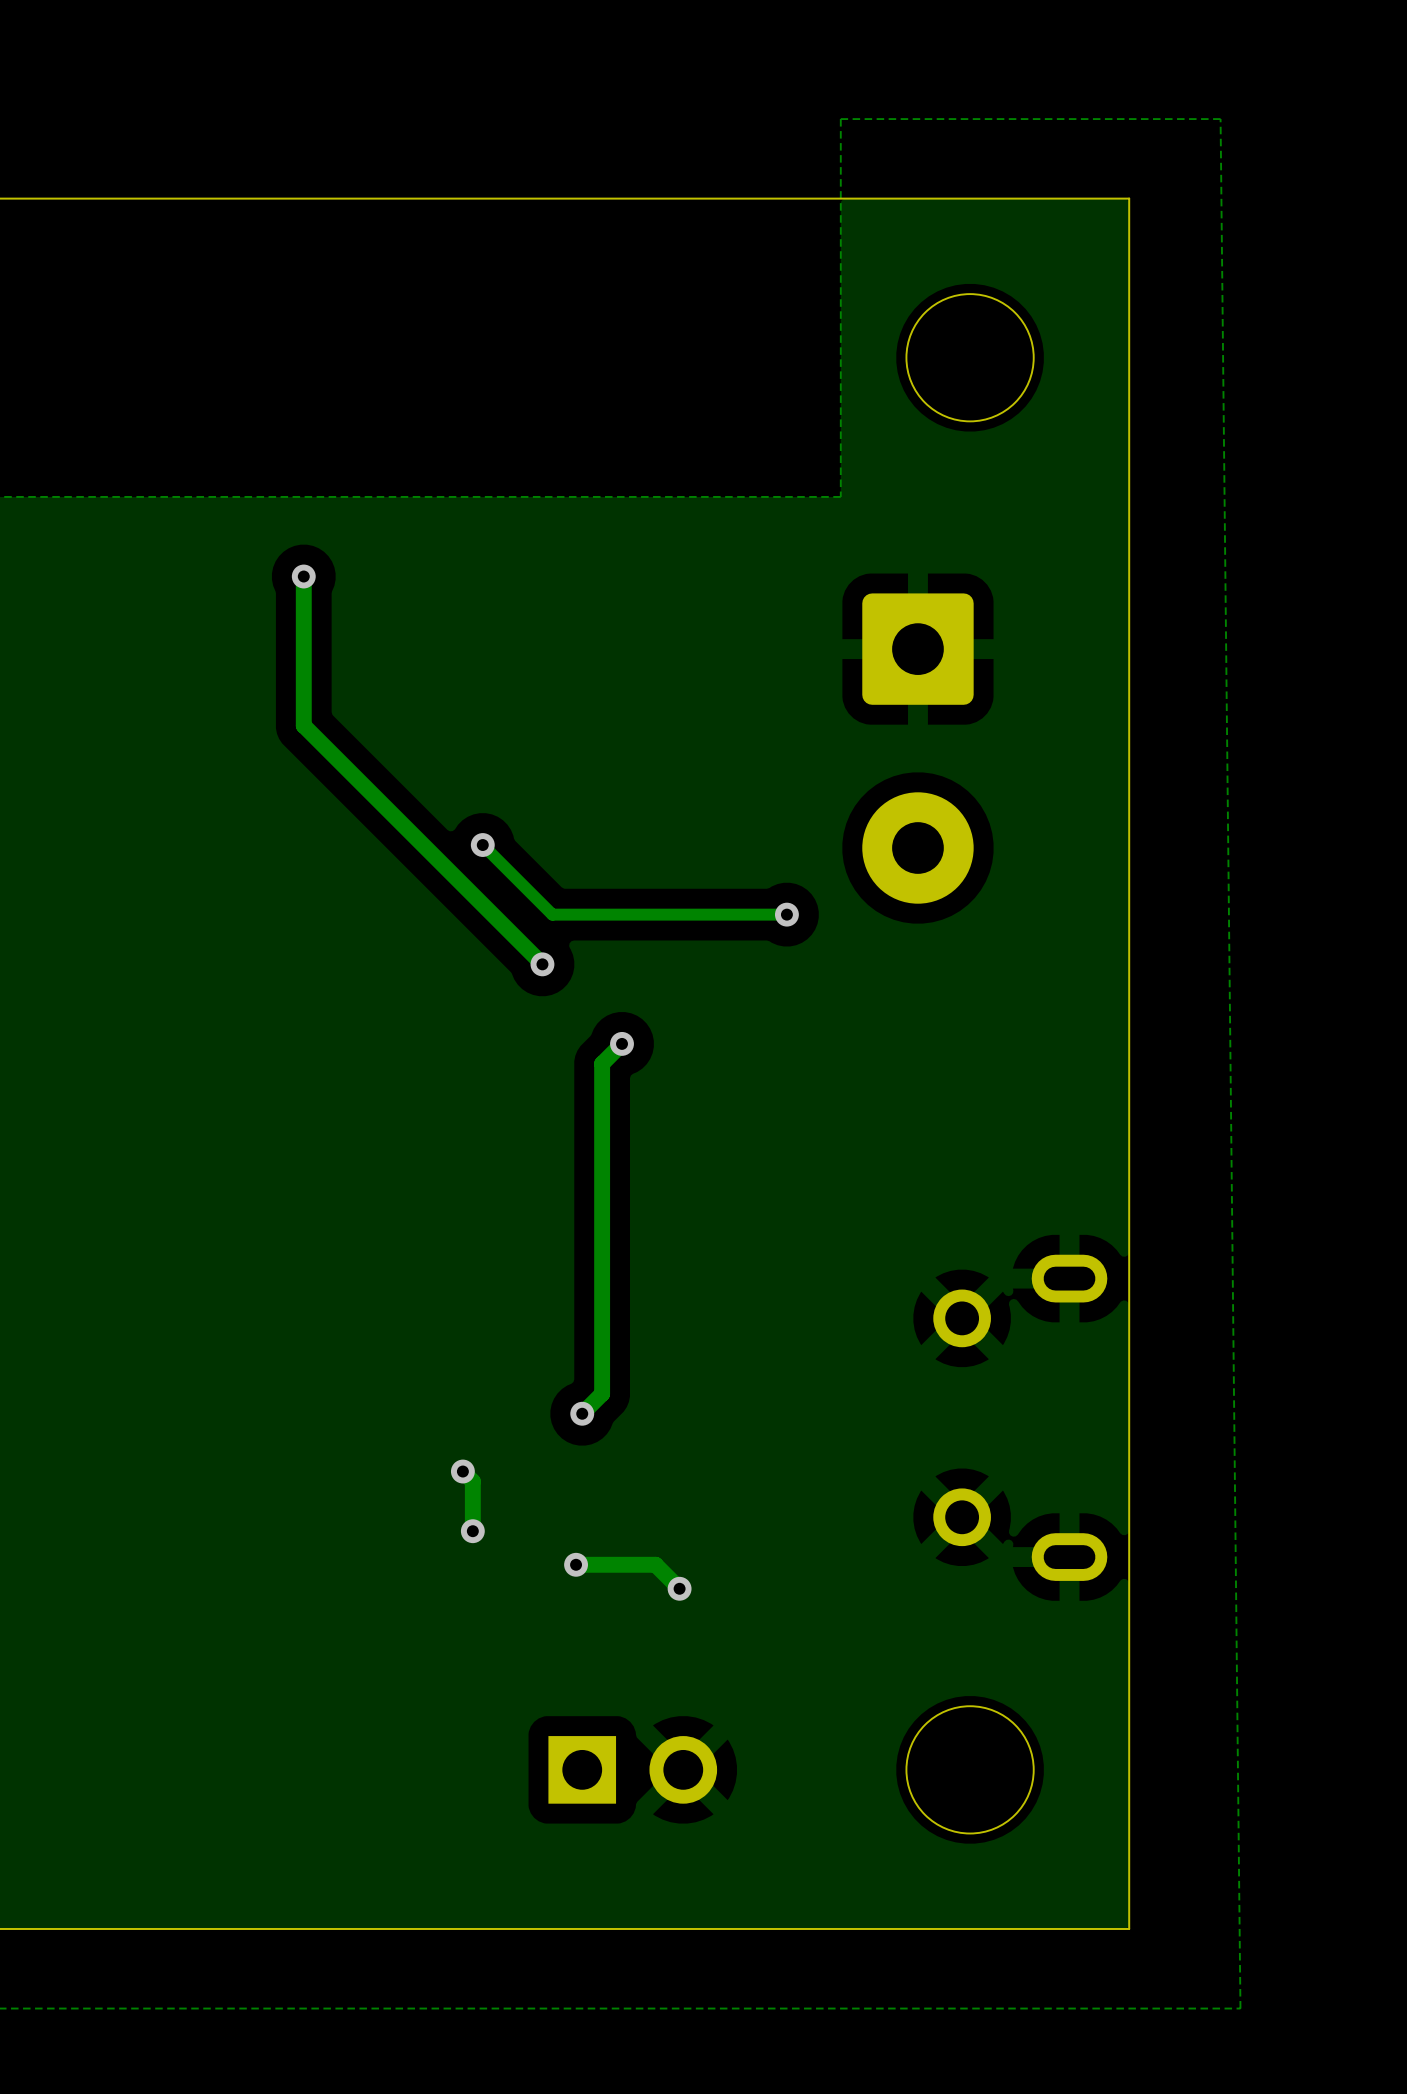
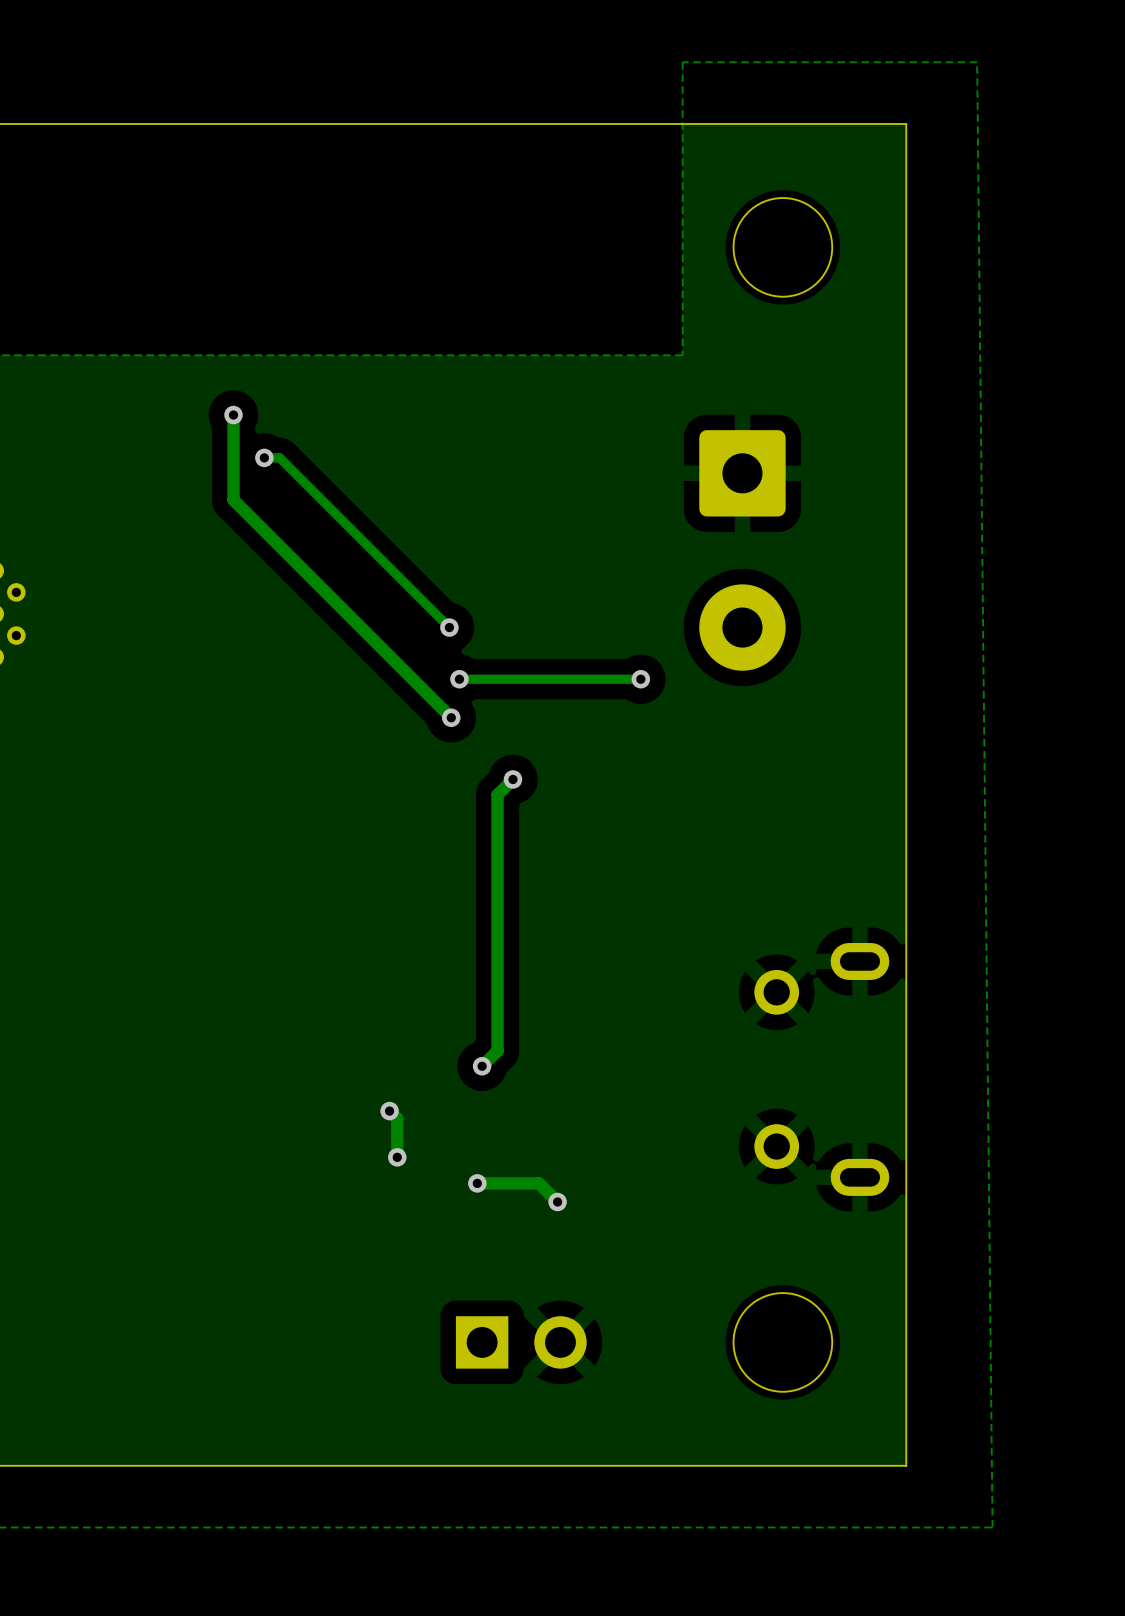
via: none -> (233, 415)
track: (303, 576) (303, 725) -> (233, 415) (233, 500) (266, 532)
via: (303, 576) -> none
track: none -> (264, 457) (279, 457) (449, 627)
via: none -> (264, 457)
track: (482, 845) (552, 914) -> none
via: (482, 845) -> none
via: none -> (449, 627)
via: none -> (459, 679)

